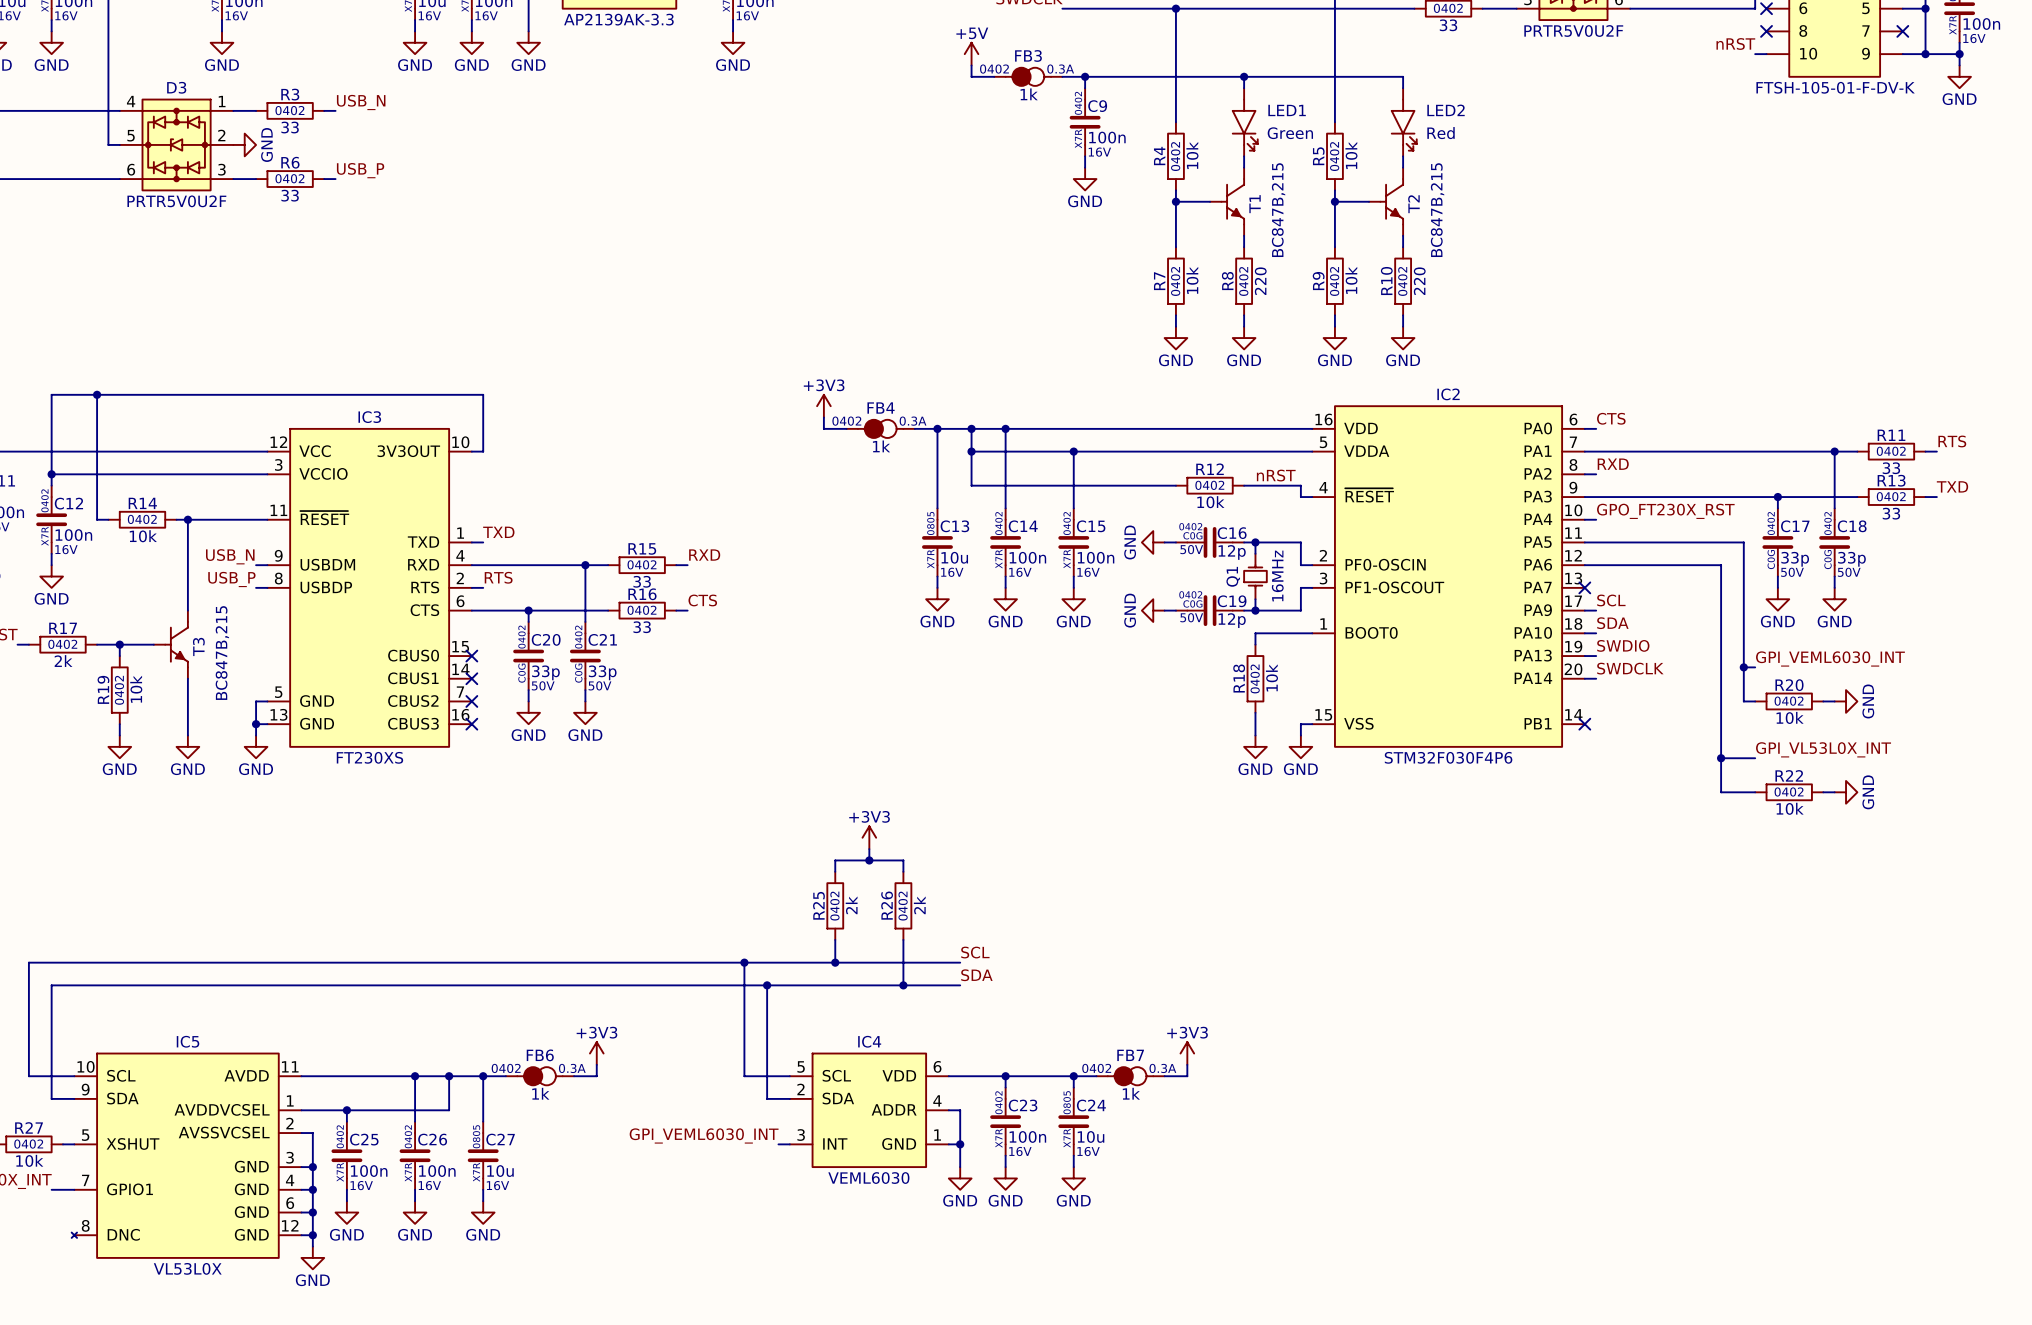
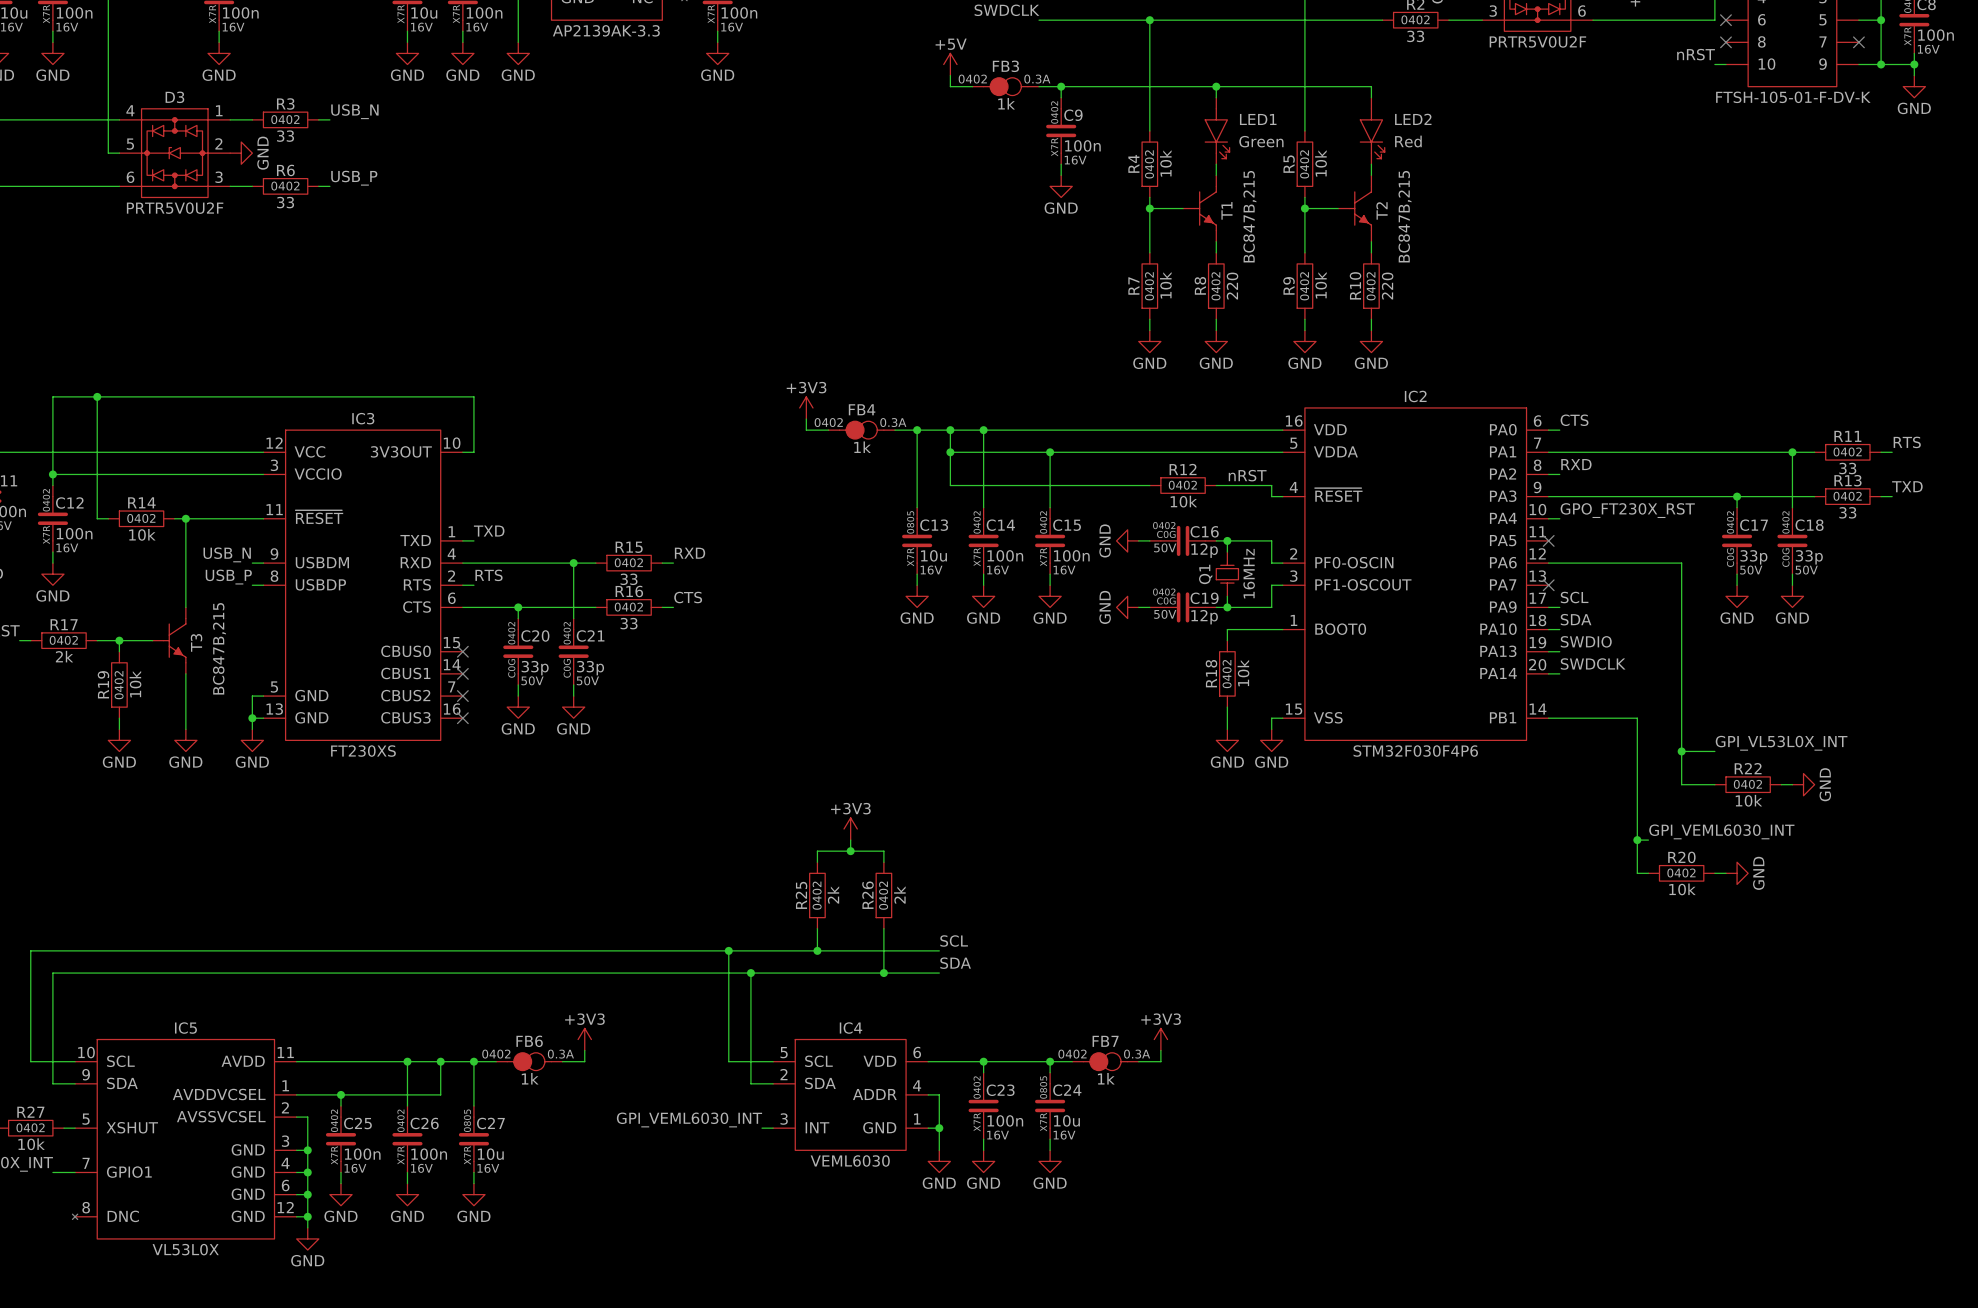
wire: (1584, 542) (1743, 542) (1743, 701) (1755, 701) -> none
no-connect mark: none -> (1548, 540)
label position: GPI_VEML6030_INT (1830, 658) -> GPI_VEML6030_INT (1721, 831)
wire: (1743, 667) (1755, 667) -> (1637, 840) (1648, 840)
junction: (1743, 667) -> none
R20 position: (1789, 701) -> (1681, 873)
wire: (1823, 701) (1834, 701) -> (1714, 873) (1725, 873)
power symbol position: GND (1846, 701) -> GND (1737, 873)
wire: none -> (1548, 718) (1637, 718) (1637, 873) (1648, 873)
no-connect mark: (1584, 724) -> none
junction: none -> (1637, 840)

